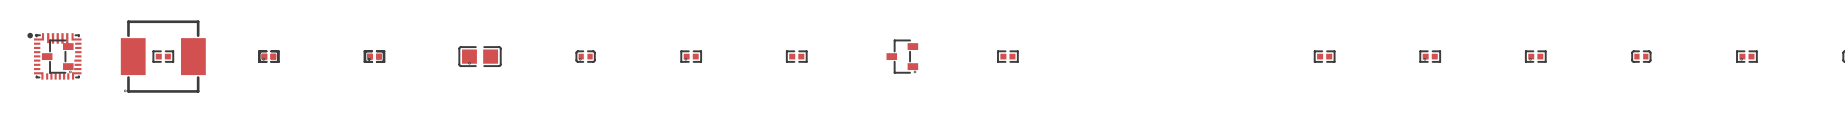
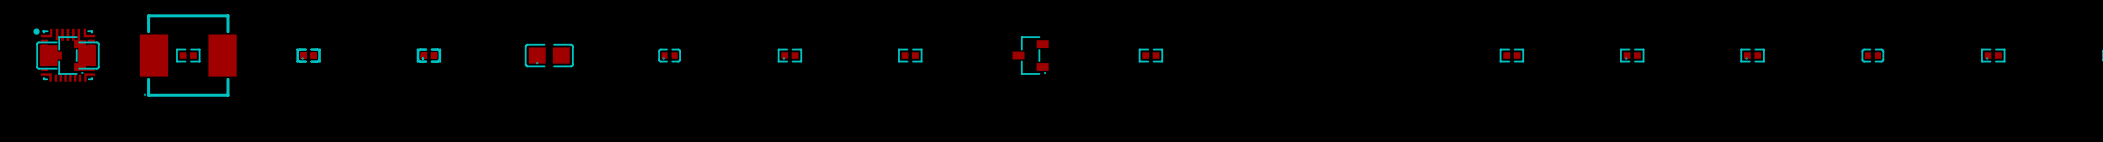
part: none -> (67, 55)

